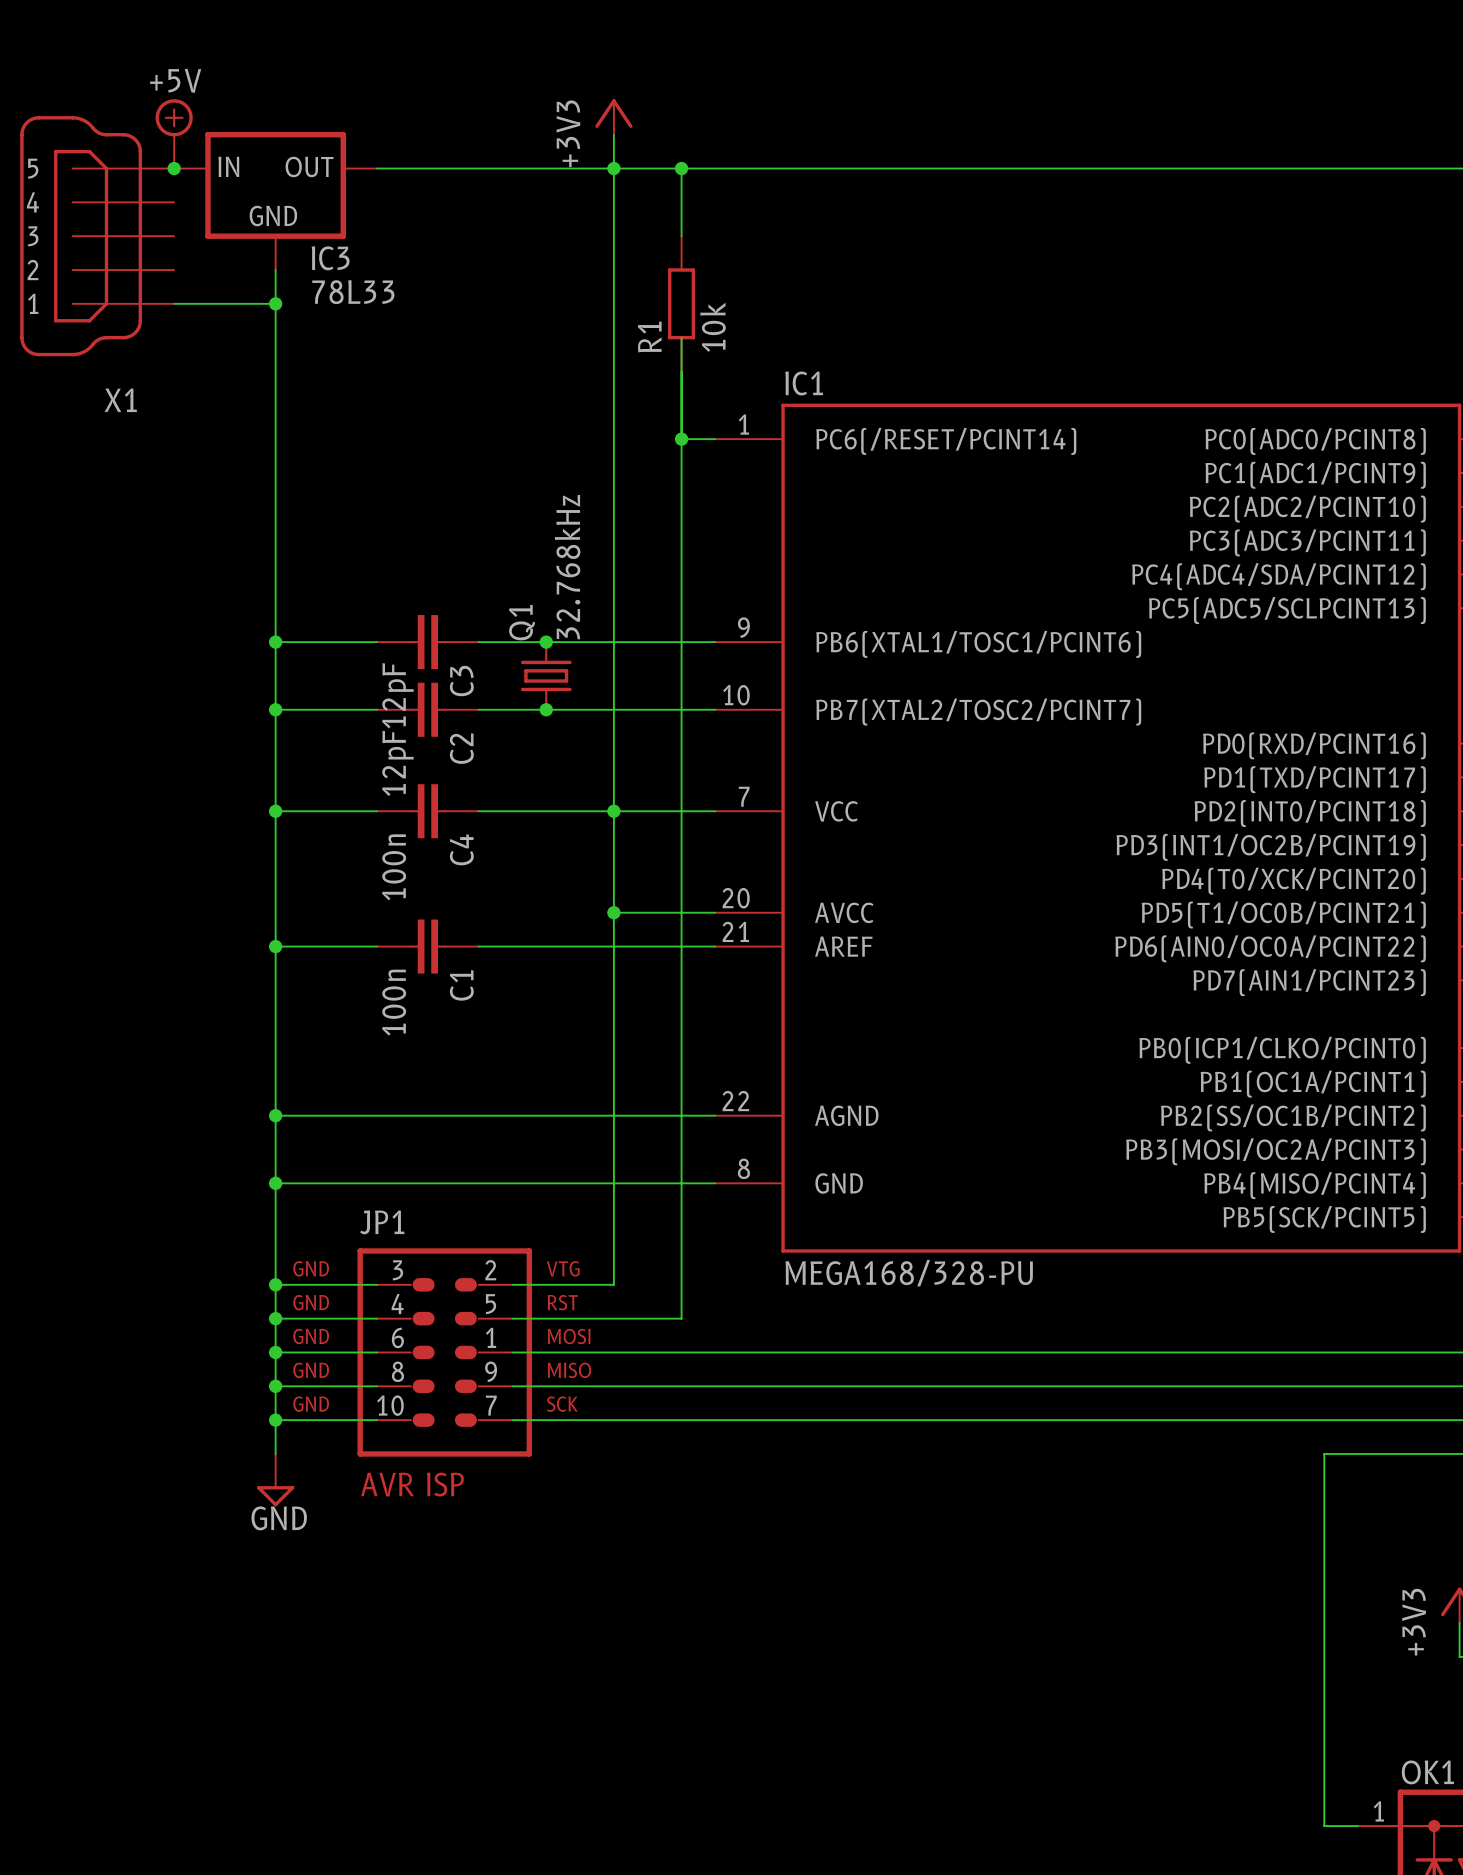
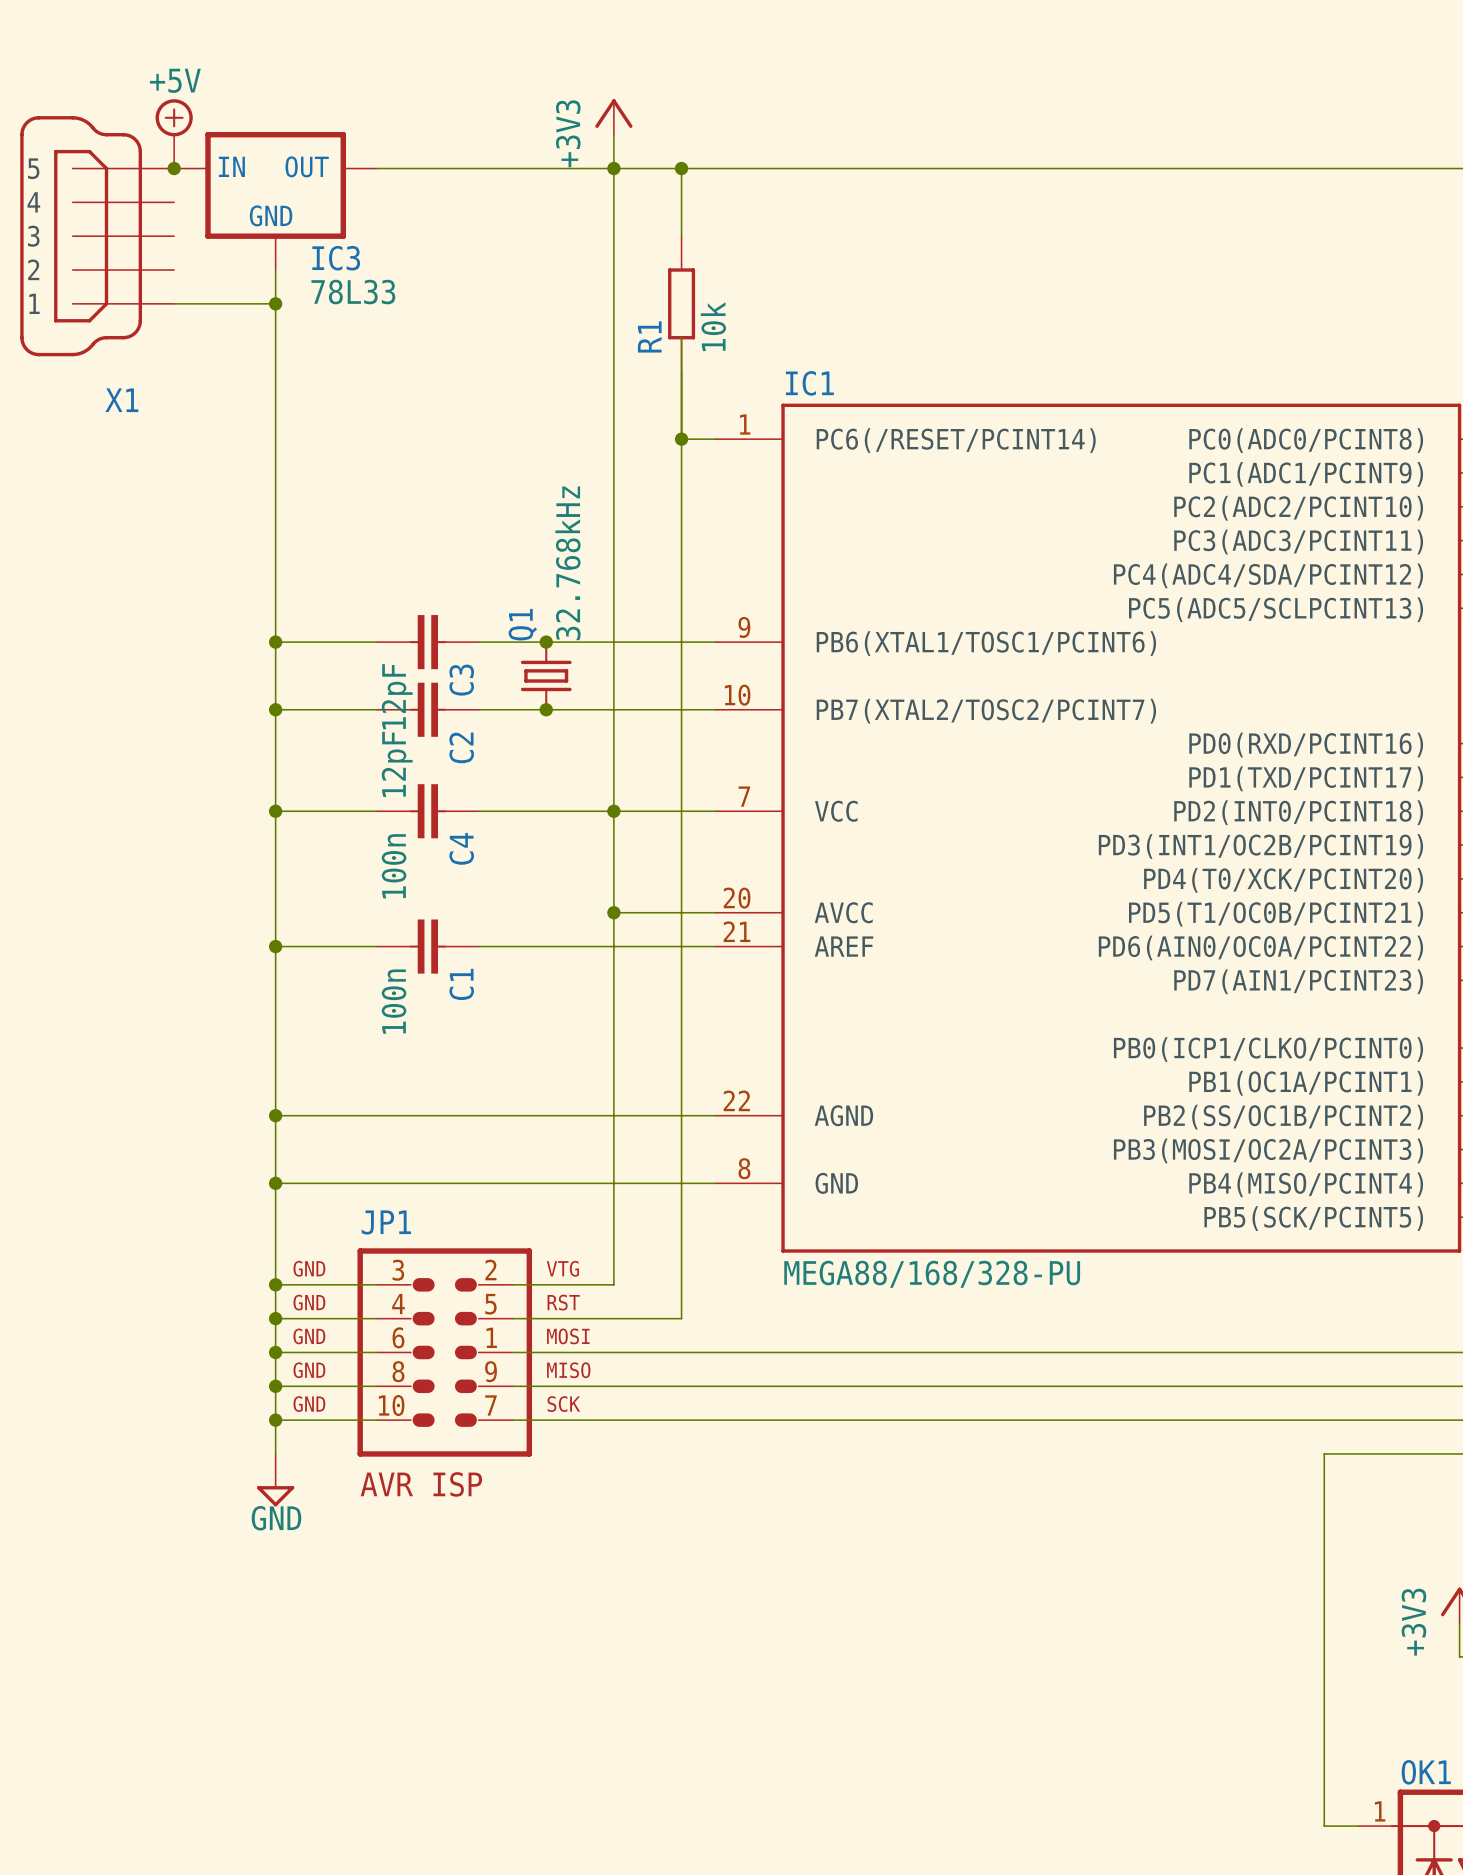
IC1 value: MEGA168/328-PU (909, 1273) -> MEGA88/168/328-PU (932, 1274)

